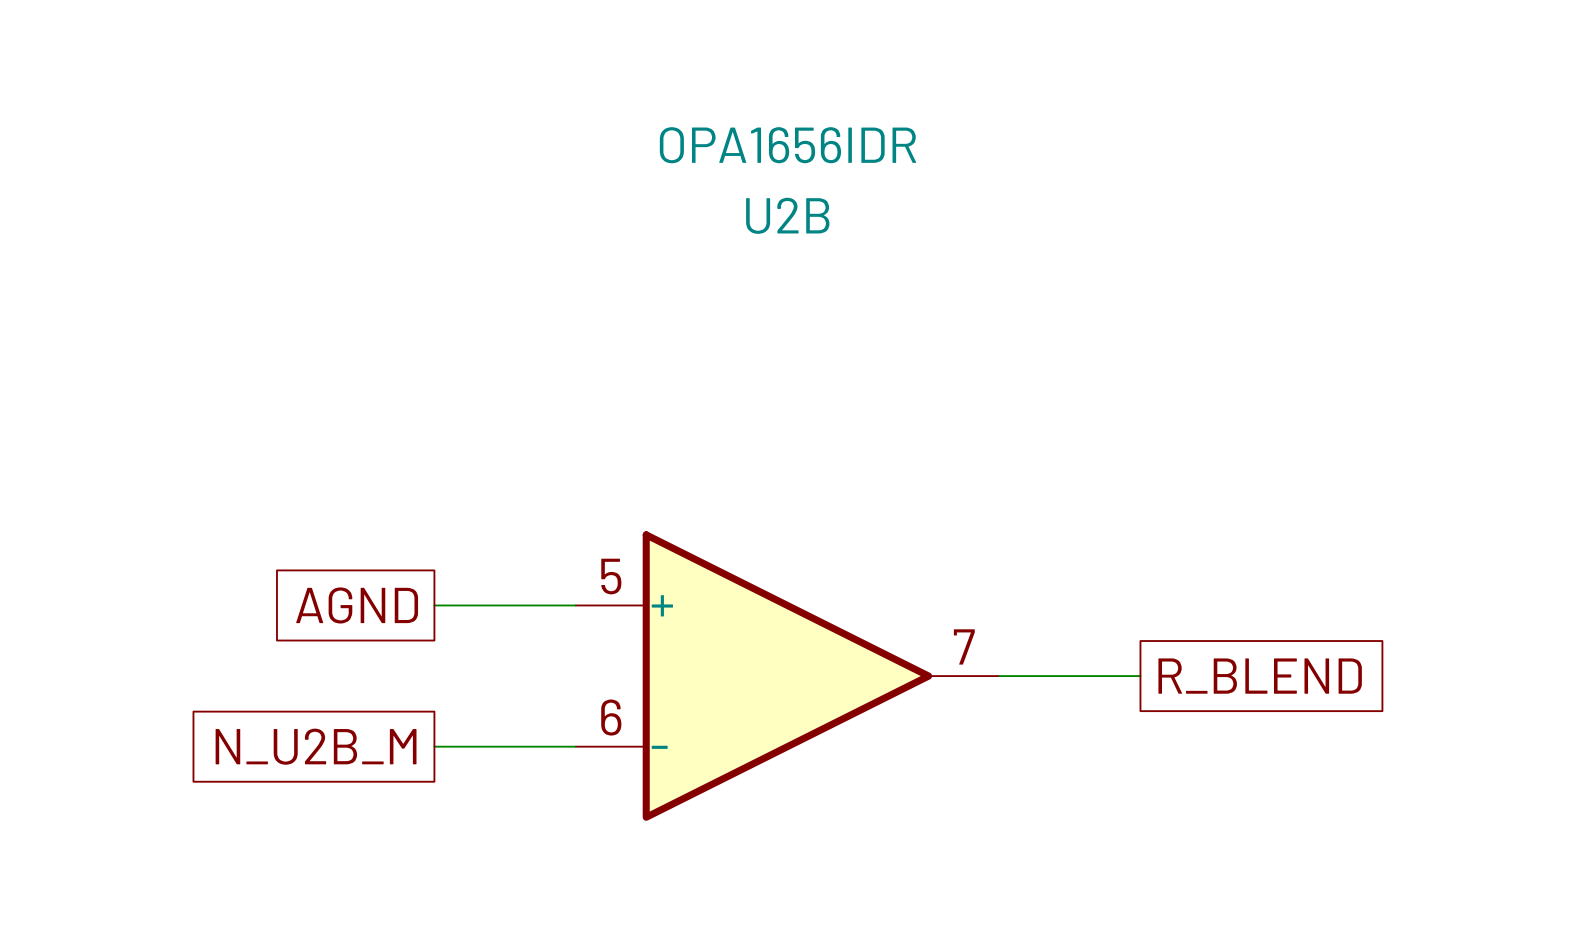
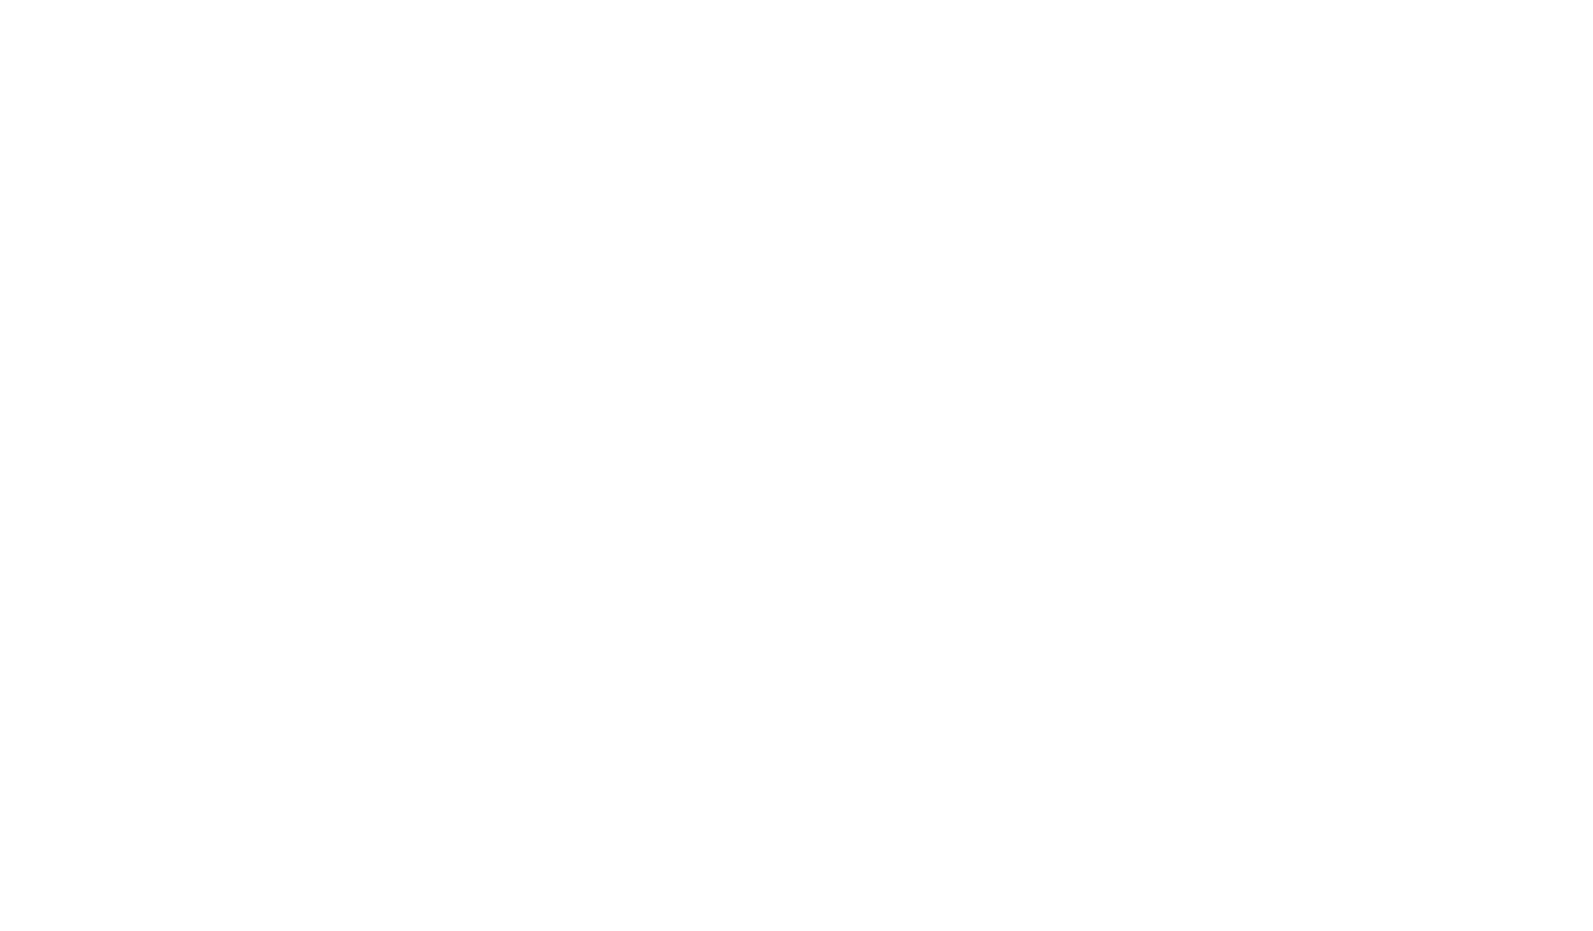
global label: AGND (357, 605) -> none
wire: (434, 605) (575, 605) -> none
U2B: OPA1656IDR (787, 676) -> none
wire: (999, 676) (1140, 676) -> none
global label: R_BLEND (1260, 676) -> none
global label: N_U2B_M (316, 746) -> none
wire: (434, 746) (575, 746) -> none

